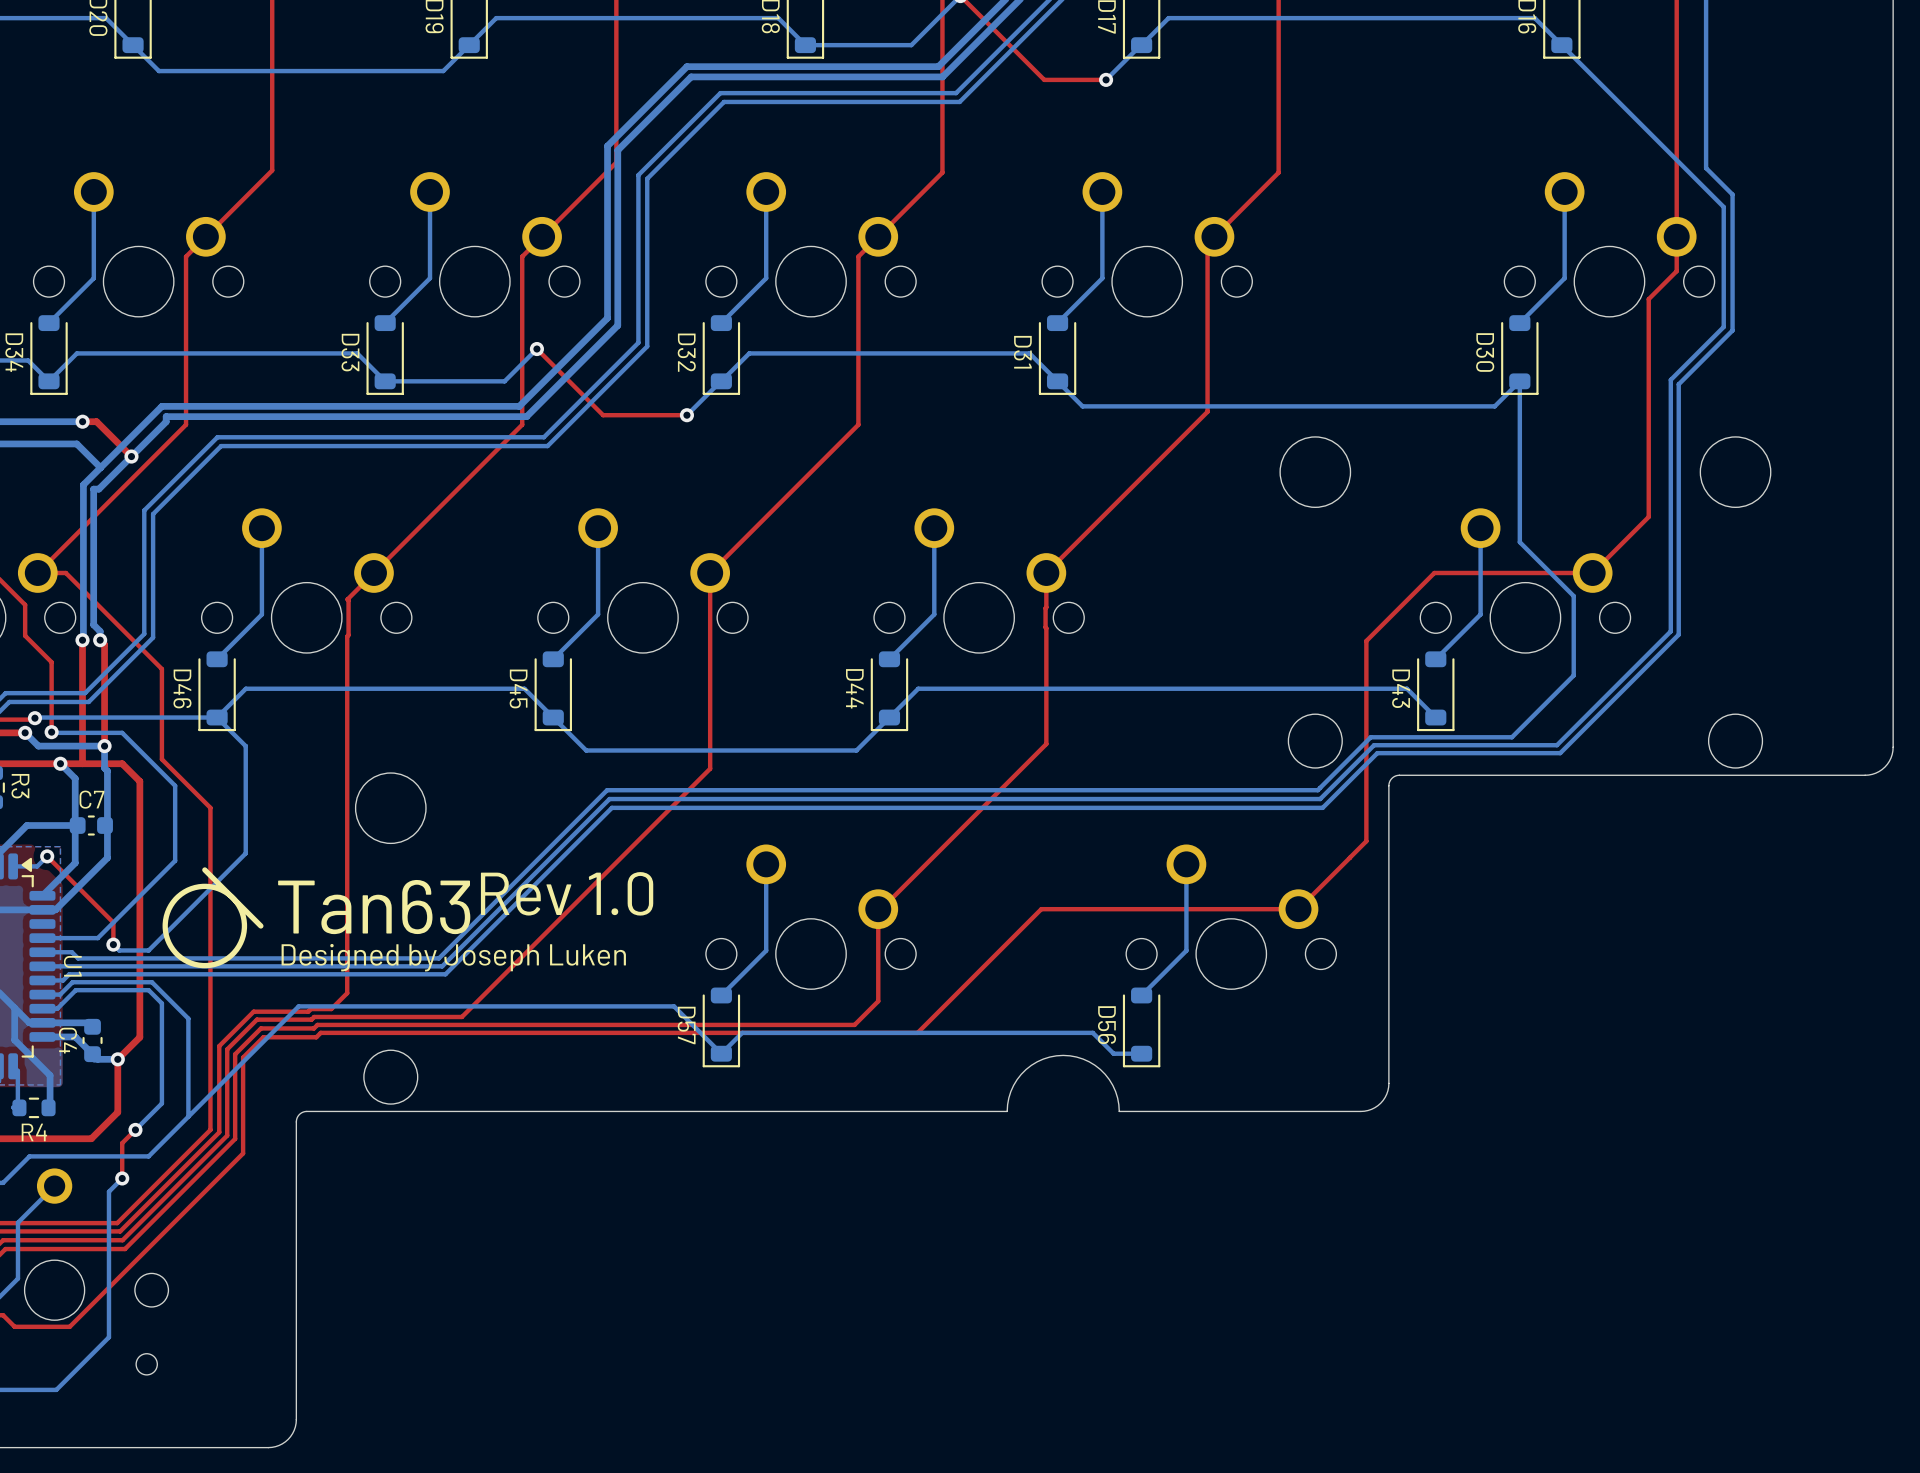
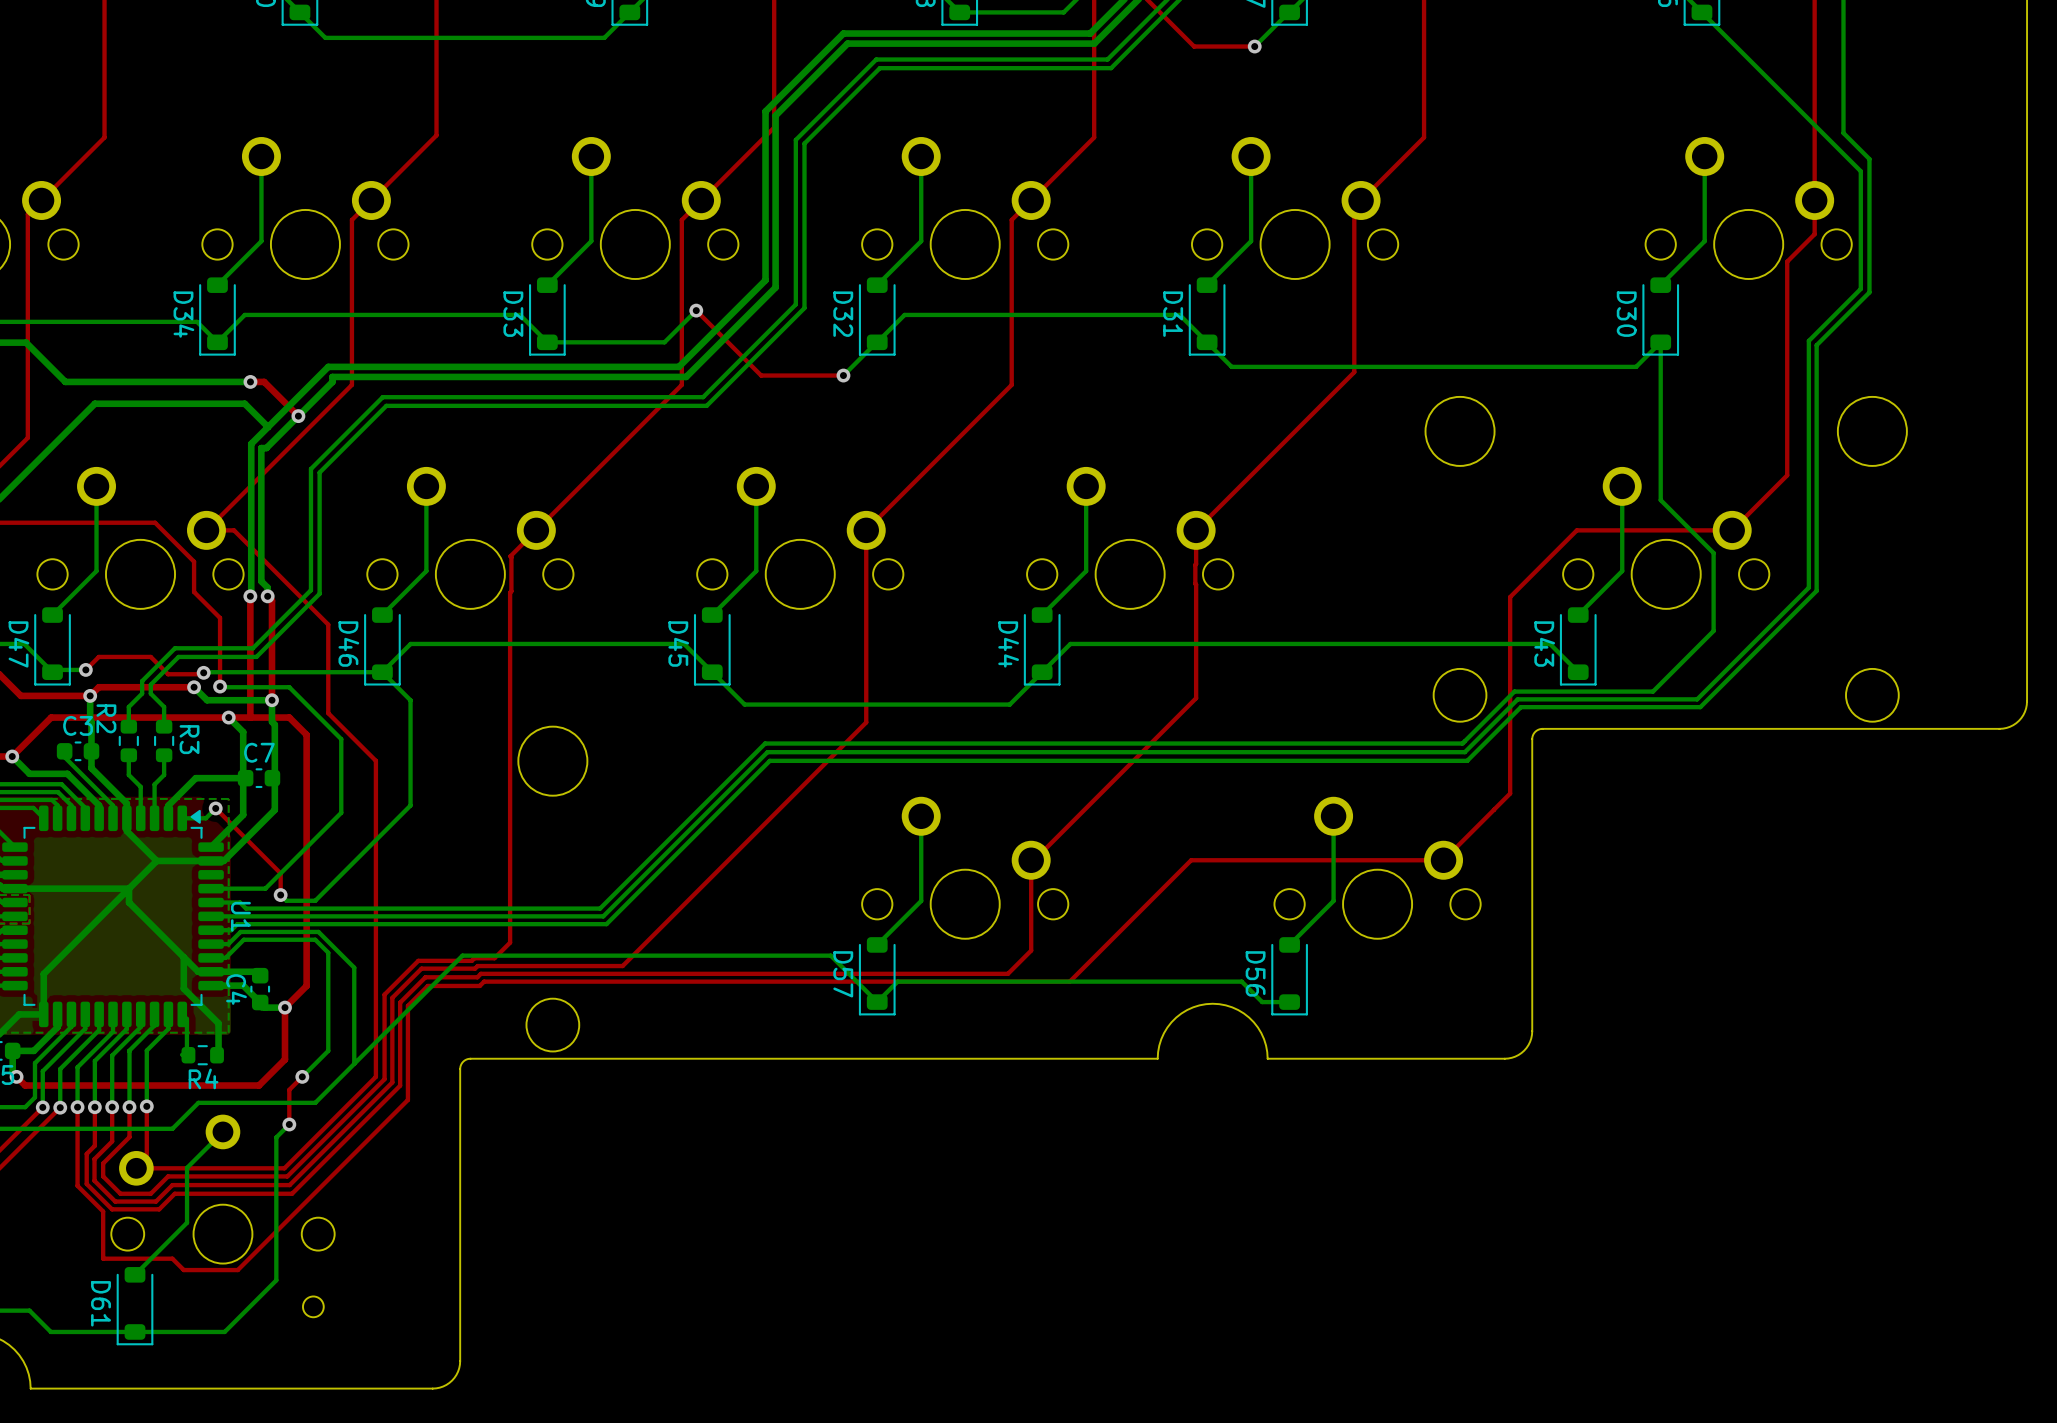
line: (204, 869) (260, 925) -> none
drawing: [162, 883, 248, 969] -> none
text: Tan63Rev 1.0 (465, 903) -> none
text: Designed by Joseph Luken (453, 957) -> none

